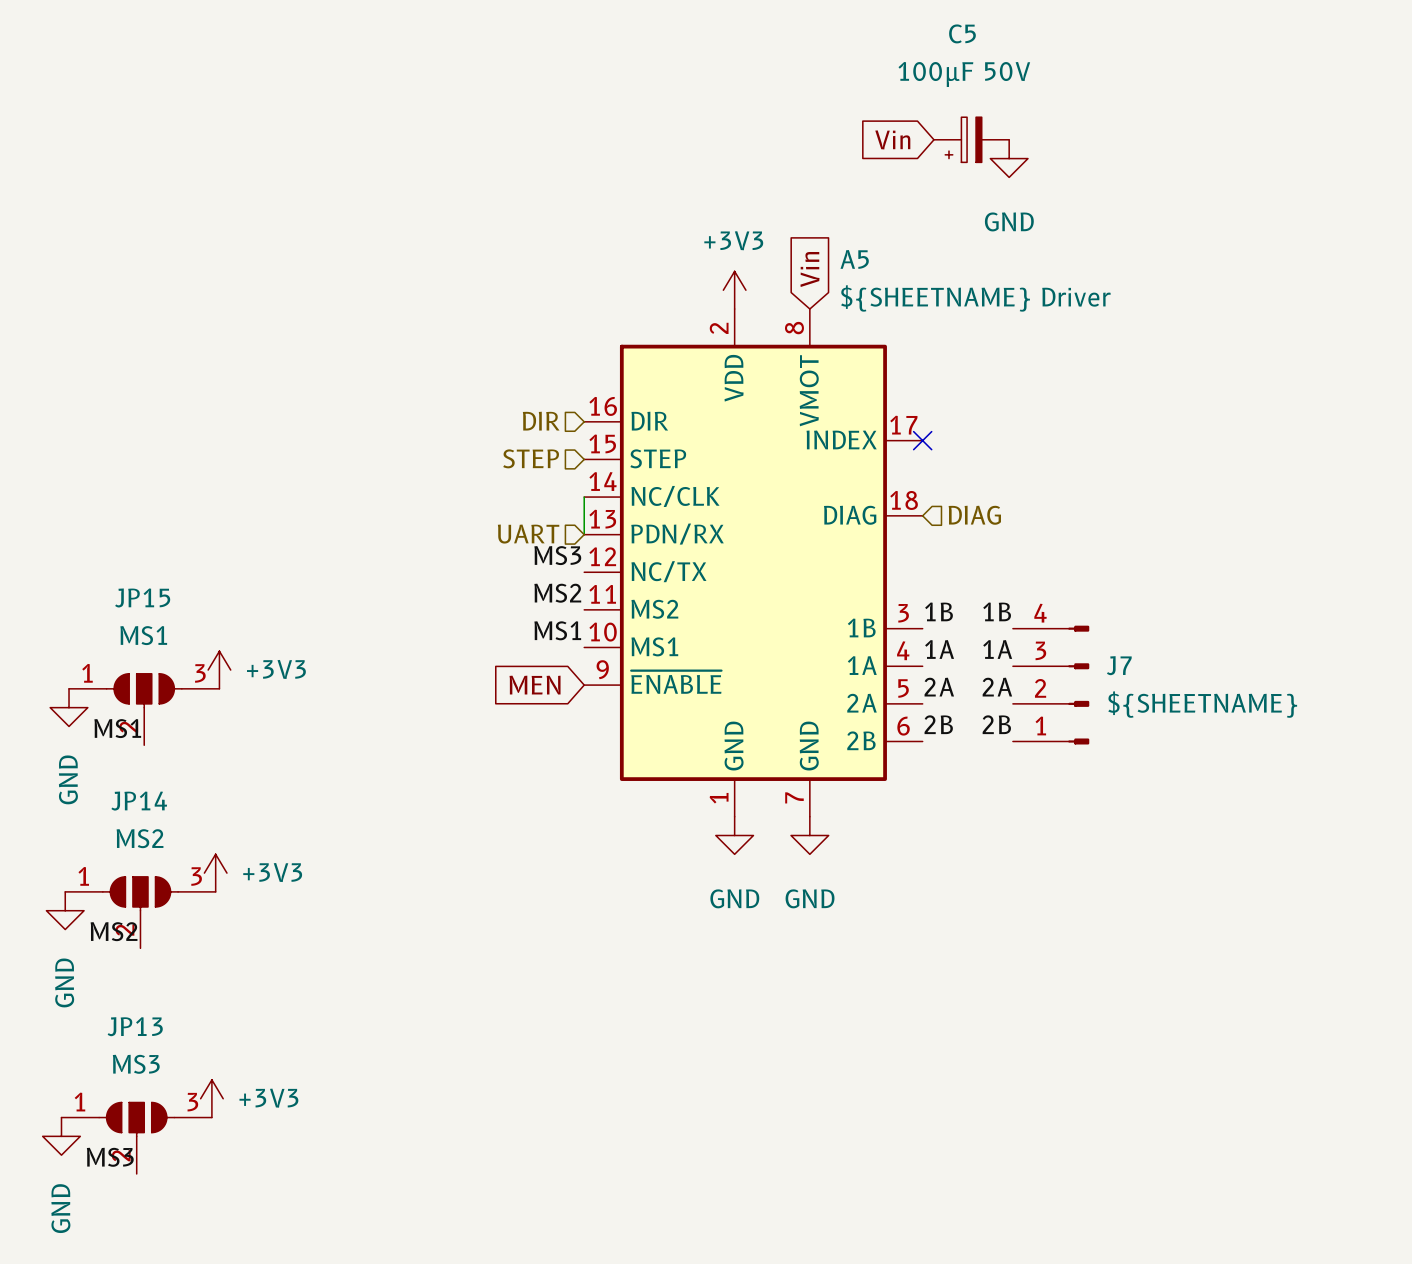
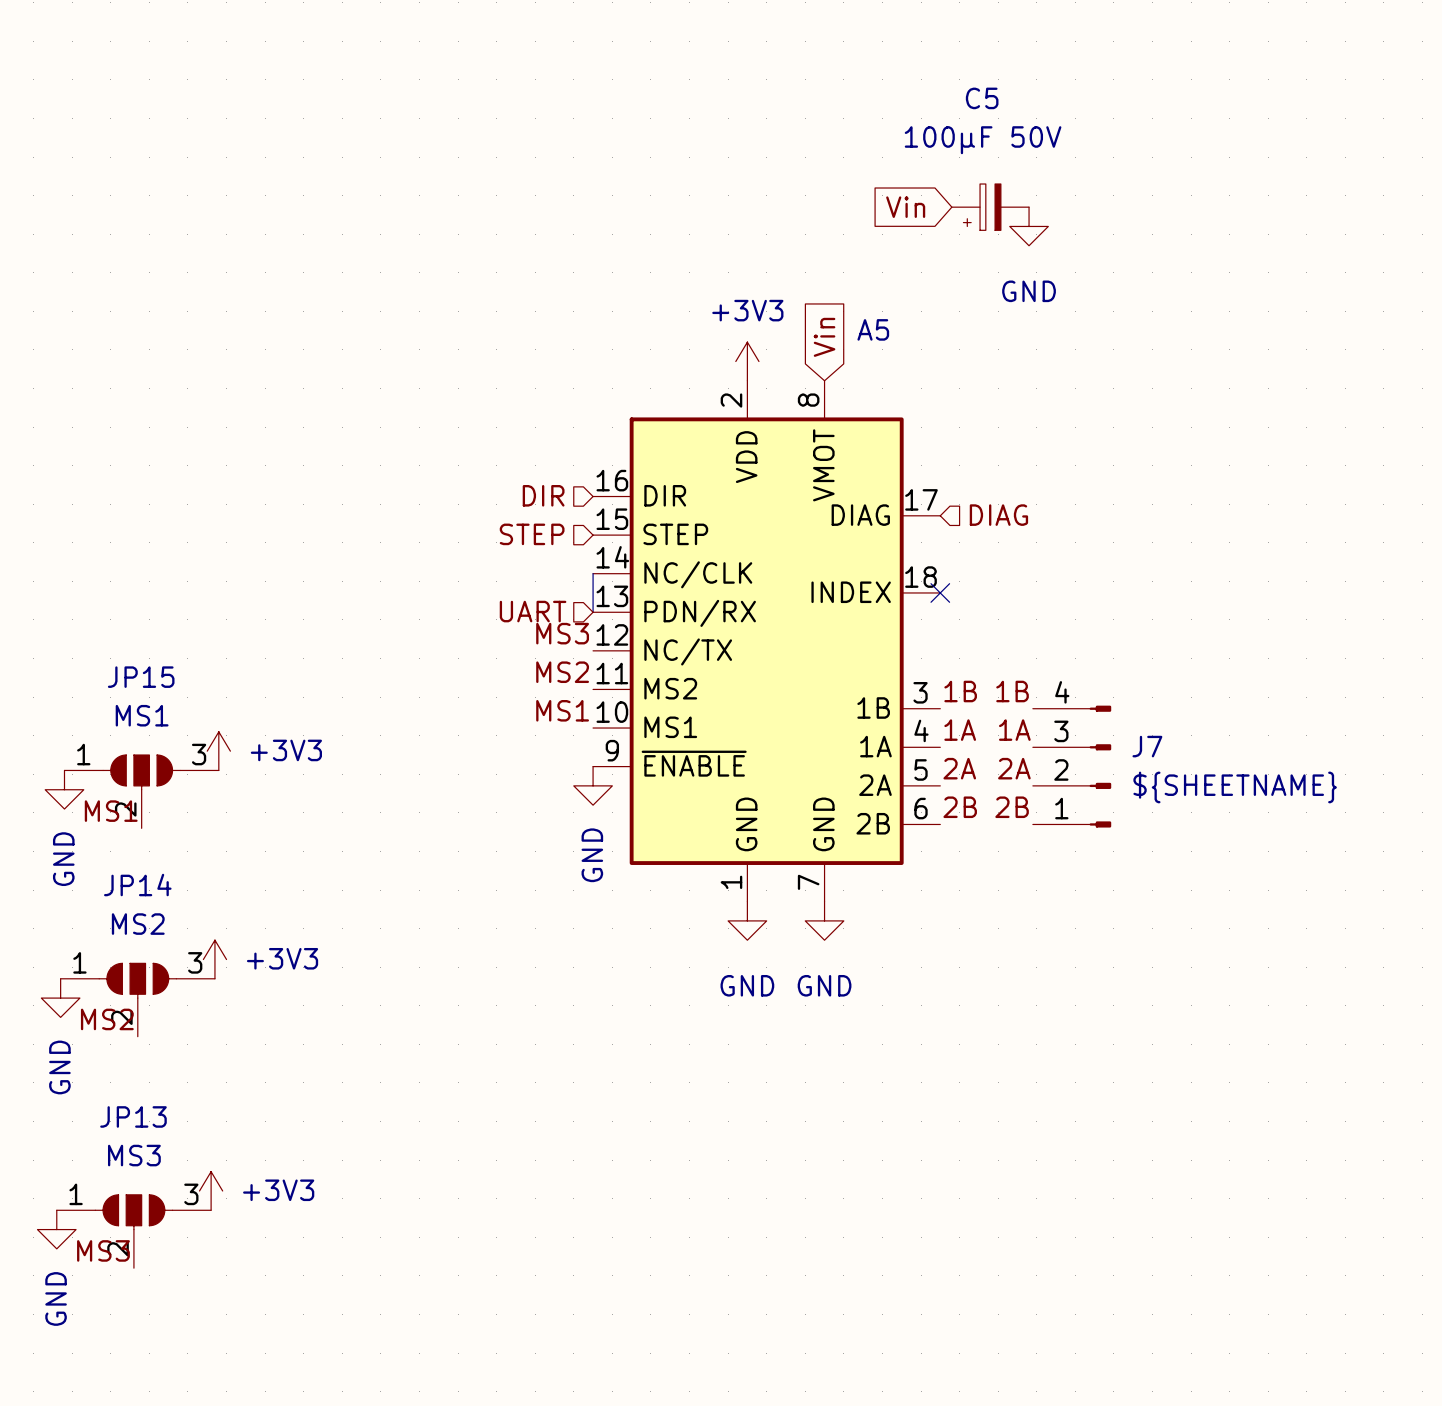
A5 value: ${SHEETNAME} Driver (975, 298) -> none
A5 pin name: INDEX (841, 439) -> DIAG (860, 515)
no-connect mark position: (922, 440) -> (940, 592)
A5 pin name: DIAG (850, 515) -> INDEX (851, 592)
hierarchical label position: DIAG (974, 515) -> DIAG (998, 515)
global label: MEN (535, 685) -> none
power symbol: none -> GND (593, 785)

